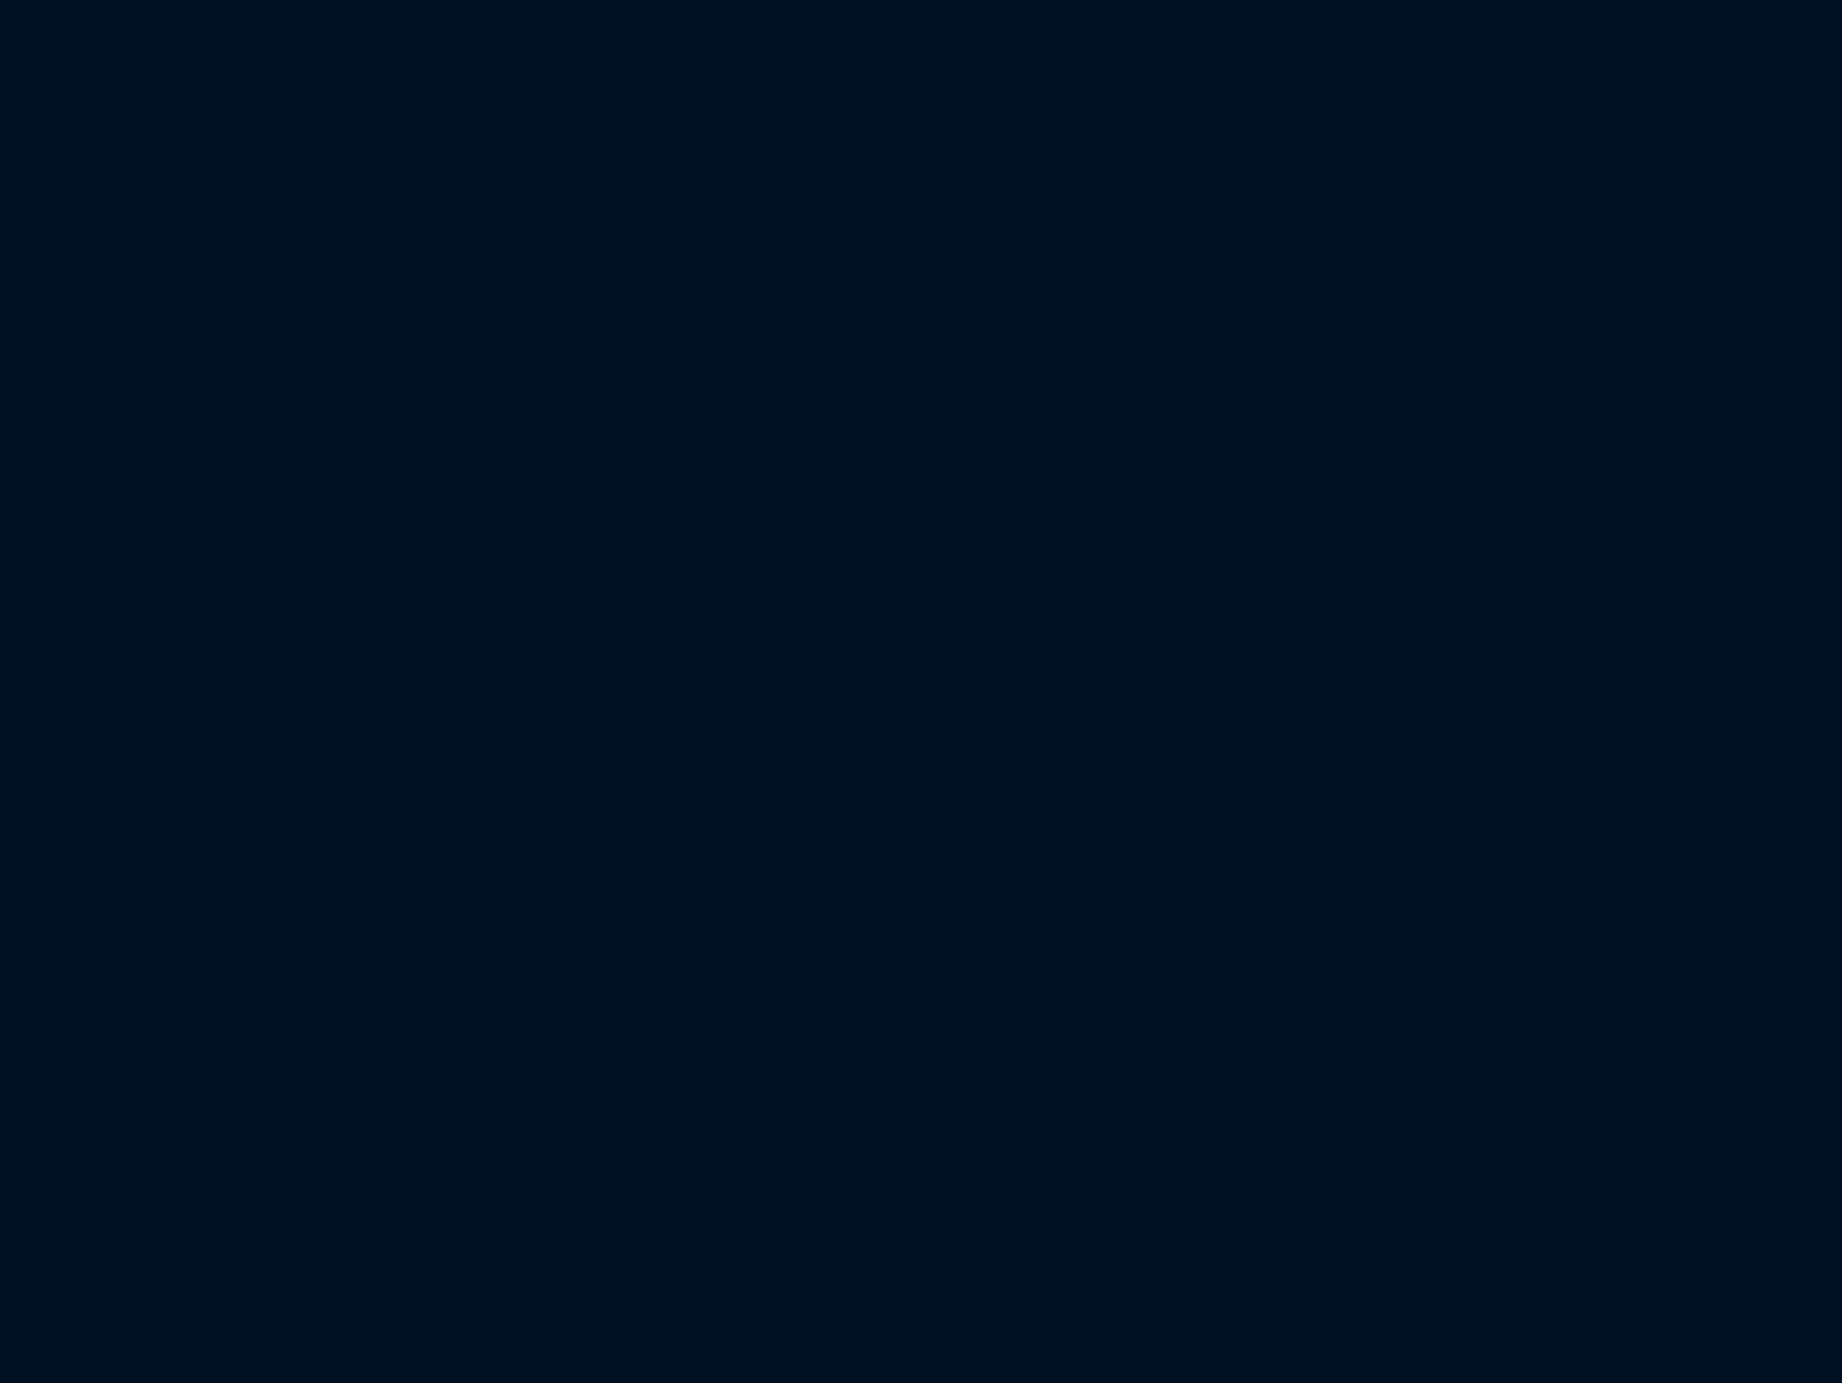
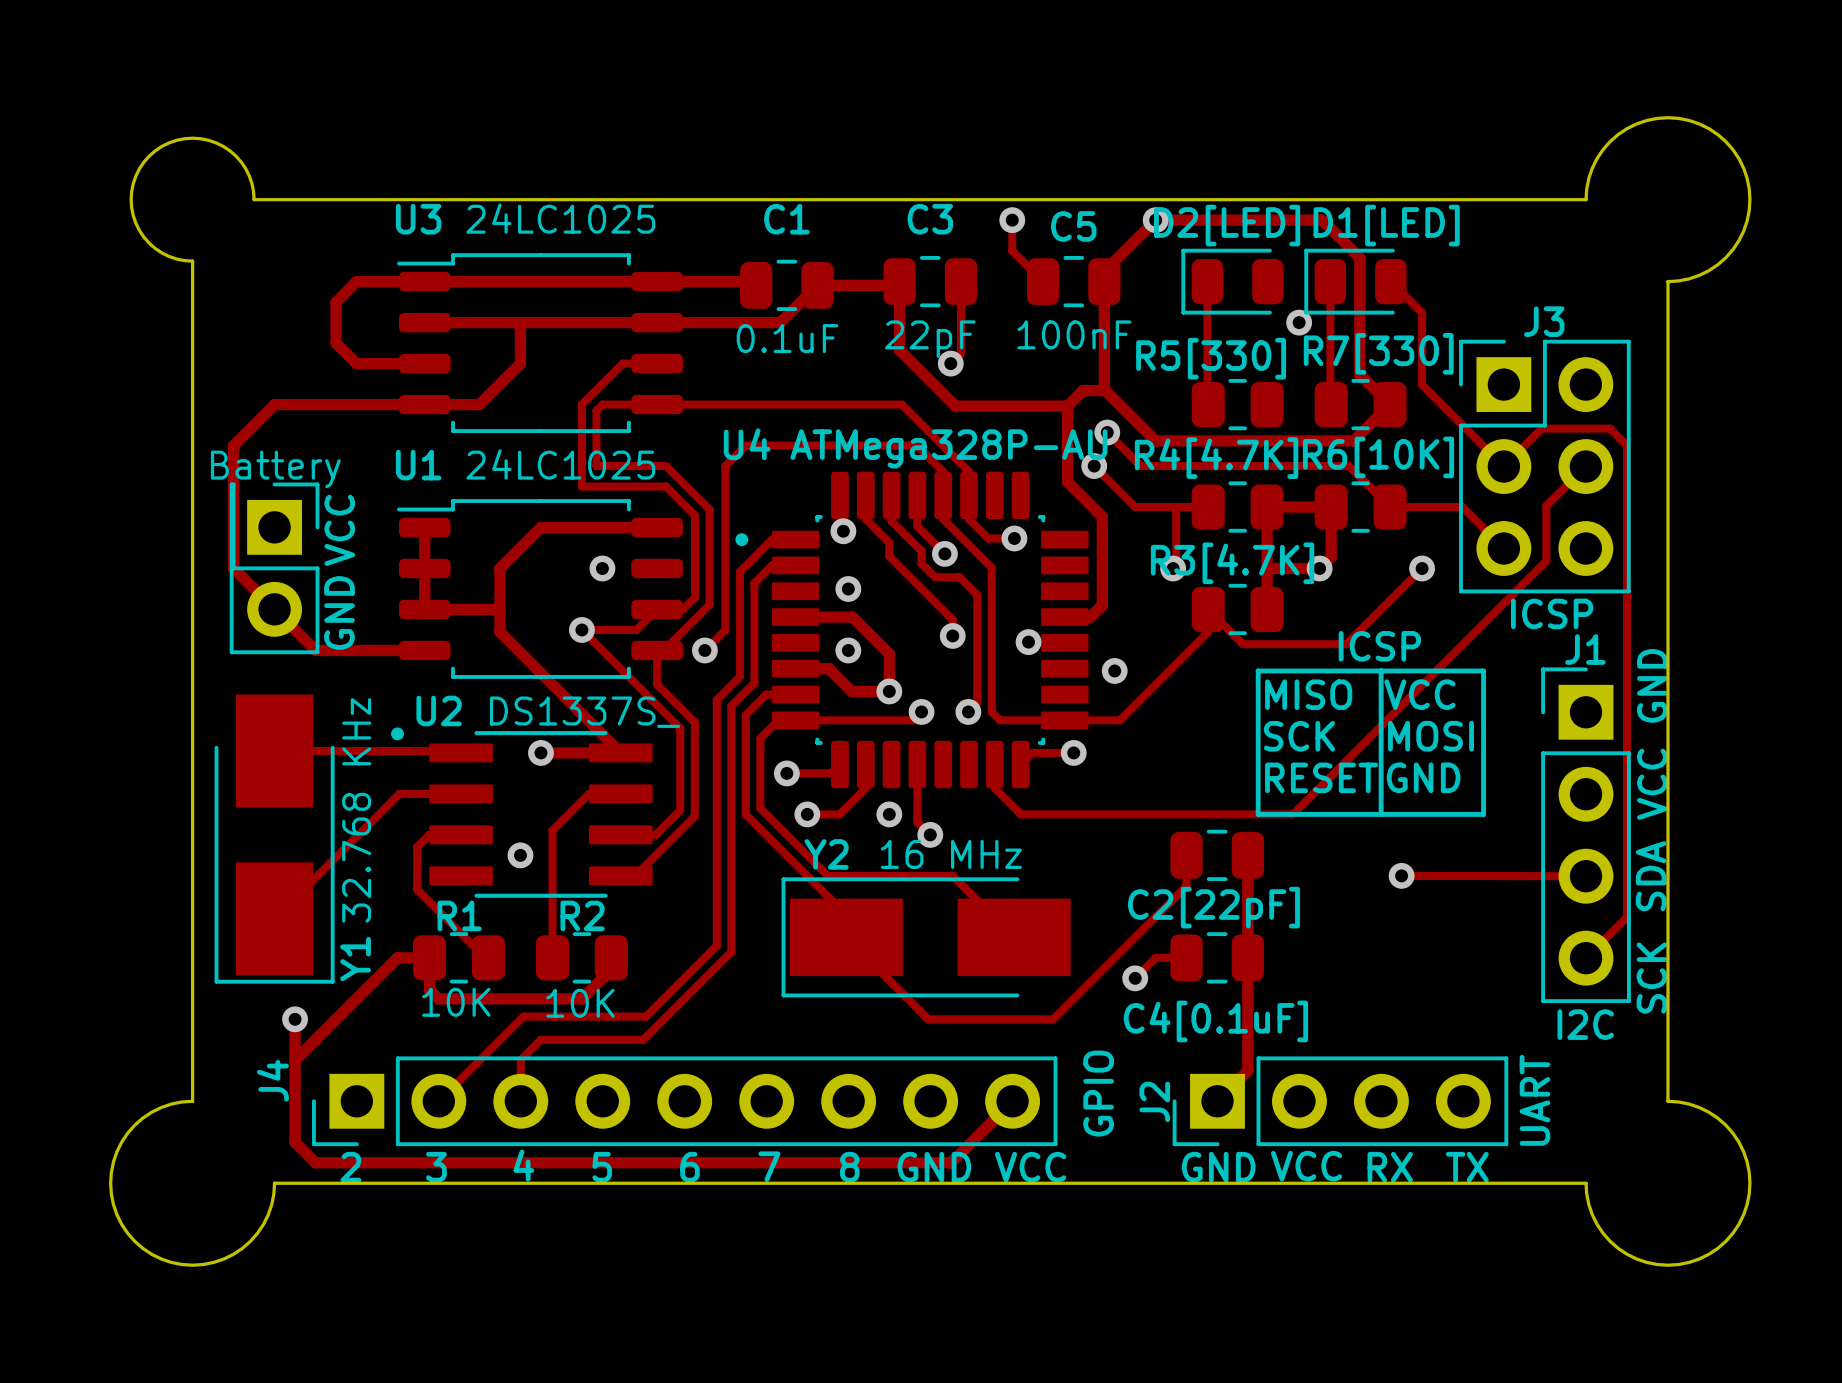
board edge: none -> (254, 199) (1586, 199) (1588, 178) (1597, 158) (1618, 134) (1636, 123) (1657, 118) (1678, 118) (1699, 123) (1717, 134) (1733, 149) (1743, 168) (1749, 199) (1747, 220) (1733, 249) (1717, 264) (1699, 275) (1667, 281) (1667, 1101) (1689, 1104) (1708, 1112) (1733, 1133) (1743, 1151) (1749, 1172) (1749, 1193) (1743, 1214) (1733, 1233) (1717, 1248) (1689, 1262) (1657, 1264) (1636, 1258) (1610, 1241) (1597, 1224) (1588, 1204) (1586, 1183) (274, 1183) (271, 1204) (263, 1224) (242, 1248) (223, 1258) (203, 1264) (181, 1264) (161, 1258) (142, 1248) (121, 1224) (113, 1204) (110, 1183) (113, 1162) (121, 1142) (142, 1118) (171, 1104) (192, 1101) (192, 261) (176, 259) (161, 252) (143, 237) (133, 215) (131, 191) (139, 168) (155, 150) (169, 142) (192, 138) (216, 142) (236, 156) (249, 176) (254, 199)
text: none -> C3 (930, 219)
track: none -> (1012, 220) (1012, 250) (1043, 281)
via: none -> (1012, 220)
track: none -> (1155, 220) (1322, 220) (1359, 257) (1359, 374) (1390, 404) (1353, 440) (1155, 440) (1104, 389) (1104, 271) (1155, 220)
via: none -> (1155, 220)
text: none -> D2[LED] (1227, 225)
text: none -> D1[LED] (1386, 225)
part: none -> 22pF (930, 281)
track: none -> (960, 281) (960, 353) (950, 363)
C5: none -> 100nF (1073, 281)
track: none -> (1207, 281) (1208, 404)
part: none -> (1232, 281)
track: none -> (1330, 281) (1331, 404)
part: none -> (1355, 281)
track: none -> (1390, 281) (1422, 312) (1422, 384) (1503, 466) (1541, 428) (1610, 428) (1627, 445) (1627, 917) (1586, 958)
track: none -> (756, 285) (752, 281) (356, 281) (336, 302) (336, 343) (356, 363) (424, 363)
C1: none -> 0.1uF (786, 285)
track: none -> (424, 322) (780, 322) (817, 285) (895, 285) (899, 281) (899, 350) (955, 406) (1067, 406)
track: none -> (520, 322) (520, 363) (479, 404) (274, 404) (233, 445) (233, 568) (315, 650) (424, 650)
via: none -> (1299, 322)
U3: none -> 24LC1025 (539, 343)
text: none -> R7[330] (1378, 353)
text: none -> R5[330] (1211, 358)
track: none -> (657, 363) (622, 363) (581, 404) (581, 486) (666, 486) (695, 515) (695, 597) (682, 609) (657, 609) (636, 629) (581, 629) (680, 728) (680, 810) (655, 834) (620, 834)
via: none -> (950, 363)
track: none -> (1105, 390) (1083, 390) (1067, 406)
part: none -> (1237, 404)
part: none -> (1360, 404)
track: none -> (1067, 406) (1067, 481) (1102, 516) (1102, 605) (1090, 617) (1064, 617)
track: none -> (1107, 432) (1140, 466) (1349, 466) (1390, 507) (1462, 507) (1503, 548)
via: none -> (1107, 432)
text: none -> R6[10K] (1378, 457)
text: none -> R4[4.7K] (1216, 458)
track: none -> (1094, 466) (1135, 507) (1208, 507)
via: none -> (1094, 466)
J3: none -> (1544, 466)
track: none -> (1585, 466) (1546, 506) (1546, 560) (1292, 814) (1020, 814) (994, 788) (994, 764)
track: none -> (865, 495) (865, 519) (889, 542) (889, 556) (952, 619) (952, 635)
track: none -> (891, 495) (891, 521) (921, 551) (921, 563) (935, 577) (959, 577) (977, 594) (977, 703) (968, 711)
track: none -> (917, 495) (917, 526) (944, 553)
track: none -> (1176, 507) (1176, 565) (1173, 568)
part: none -> (1237, 507)
part: none -> (1360, 507)
track: none -> (424, 527) (424, 609) (499, 609)
track: none -> (657, 527) (540, 527) (499, 568) (499, 632) (620, 752) (540, 752)
text: none -> VCC (339, 530)
via: none -> (843, 531)
track: none -> (1014, 538) (988, 538) (969, 519) (969, 471) (901, 404) (602, 404) (596, 410) (596, 466) (666, 466) (709, 509) (709, 604) (663, 650) (657, 650) (657, 684) (694, 722) (694, 816) (635, 875)
via: none -> (1014, 538)
track: none -> (795, 539) (772, 539) (739, 571) (739, 676) (716, 700) (716, 945) (646, 1016) (523, 1016) (438, 1101)
via: none -> (944, 553)
text: none -> R3[4.7K] (1232, 563)
track: none -> (795, 565) (772, 565) (754, 583) (754, 682) (731, 706) (731, 951) (643, 1039) (540, 1039) (520, 1059) (520, 1101)
part: none -> Battery (274, 568)
via: none -> (602, 568)
via: none -> (1173, 568)
track: none -> (1267, 568) (1319, 568) (1331, 556) (1331, 507) (1267, 507) (1267, 609)
via: none -> (1319, 568)
track: none -> (1422, 568) (1346, 644) (1242, 644) (1208, 609) (1208, 632) (1119, 720) (1000, 720) (991, 711) (991, 567) (943, 519) (943, 471) (917, 445) (745, 445) (725, 466) (725, 629) (704, 650)
via: none -> (1422, 568)
U1: none -> 24LC1025 (539, 589)
via: none -> (848, 589)
part: none -> (1237, 609)
text: none -> GND (339, 613)
text: none -> ICSP (1552, 613)
track: none -> (795, 617) (852, 617) (889, 653) (889, 691) (851, 691) (828, 668) (795, 668)
via: none -> (581, 629)
U4: none -> ATMega328P-AU (911, 629)
via: none -> (952, 635)
via: none -> (1028, 642)
text: none -> ICSP (1379, 646)
via: none -> (704, 650)
via: none -> (848, 650)
via: none -> (1114, 670)
line: none -> (1258, 670) (1258, 814) (1483, 814) (1483, 670) (1258, 670)
line: none -> (1381, 670) (1381, 814)
text: none -> GND (1652, 685)
via: none -> (889, 691)
track: none -> (795, 694) (766, 694) (745, 715) (745, 814) (846, 914) (846, 937) (928, 1019) (1053, 1019) (1186, 886) (1186, 855)
text: none -> MISO (1308, 694)
text: none -> VCC (1419, 694)
track: none -> (921, 711) (913, 720) (778, 720) (760, 738) (760, 808) (827, 875) (952, 875) (1014, 937)
via: none -> (921, 711)
via: none -> (968, 711)
text: none -> SCK (1299, 736)
text: none -> MOSI (1431, 736)
track: none -> (274, 751) (459, 751) (461, 752)
via: none -> (540, 752)
track: none -> (1073, 752) (1032, 752) (1020, 764)
via: none -> (1073, 752)
track: none -> (839, 764) (831, 773) (786, 773)
track: none -> (865, 764) (865, 788) (839, 814) (807, 814)
track: none -> (917, 764) (917, 821) (930, 834)
via: none -> (786, 773)
text: none -> RESET (1321, 777)
text: none -> GND (1423, 777)
text: none -> VCC (1652, 784)
track: none -> (461, 793) (399, 793) (274, 918) (274, 916)
track: none -> (620, 793) (589, 793) (552, 830) (552, 957)
U2: none -> DS1337S_ (521, 812)
via: none -> (807, 814)
via: none -> (889, 814)
track: none -> (461, 834) (429, 834) (417, 847) (417, 889) (485, 957) (488, 957)
via: none -> (930, 834)
J1: none -> (1586, 835)
Y1: none -> 32.768 KHz (274, 839)
via: none -> (520, 855)
part: none -> (1217, 855)
track: none -> (1247, 855) (1247, 1070) (1217, 1101)
track: none -> (1401, 875) (1586, 876)
via: none -> (1401, 875)
text: none -> SDA (1651, 876)
text: none -> C2[22pF] (1213, 907)
Y2: none -> 16 MHz (926, 937)
R1: none -> 10K (458, 957)
R2: none -> 10K (581, 957)
track: none -> (611, 957) (611, 969) (581, 998) (438, 998) (429, 989) (429, 957) (397, 957) (295, 1060)
track: none -> (1186, 957) (1155, 957) (1135, 978)
part: none -> (1217, 957)
via: none -> (1135, 978)
text: none -> SCK (1651, 978)
track: none -> (295, 1019) (295, 1142) (315, 1162) (951, 1162) (1012, 1101)
via: none -> (295, 1019)
text: none -> C4[0.1uF] (1215, 1021)
text: none -> I2C (1585, 1024)
text: none -> GPIO (1098, 1093)
text: none -> UART (1534, 1100)
J4: none -> (684, 1101)
J2: none -> (1340, 1101)
text: none -> 4 (523, 1165)
text: none -> 7 (769, 1166)
text: none -> VCC (1306, 1166)
text: none -> 2 (350, 1167)
text: none -> 3 (436, 1167)
text: none -> 5 (602, 1167)
text: none -> 6 (689, 1167)
text: none -> 8 (849, 1167)
text: none -> GND (934, 1167)
text: none -> VCC (1030, 1167)
text: none -> GND (1218, 1167)
text: none -> RX (1390, 1167)
text: none -> TX (1467, 1167)

